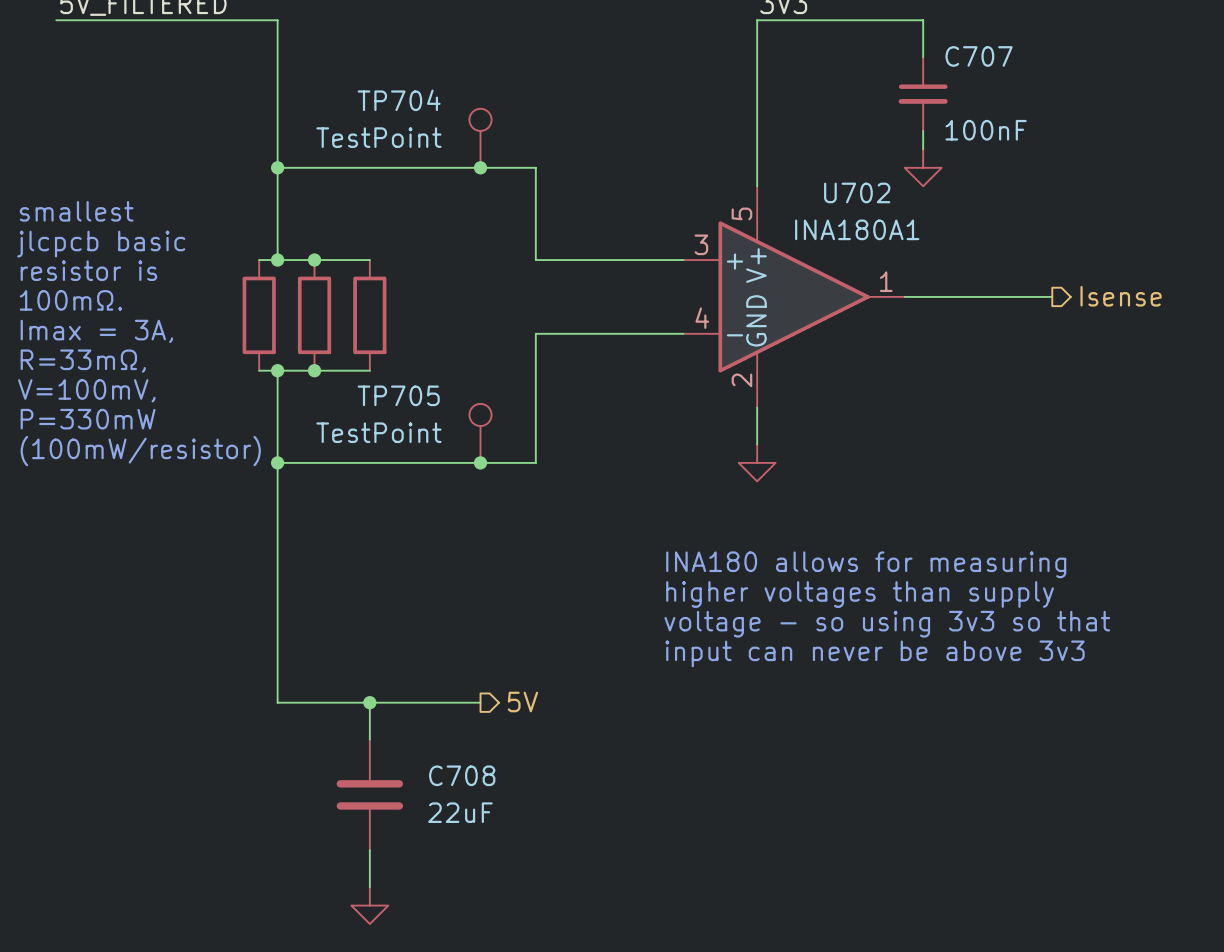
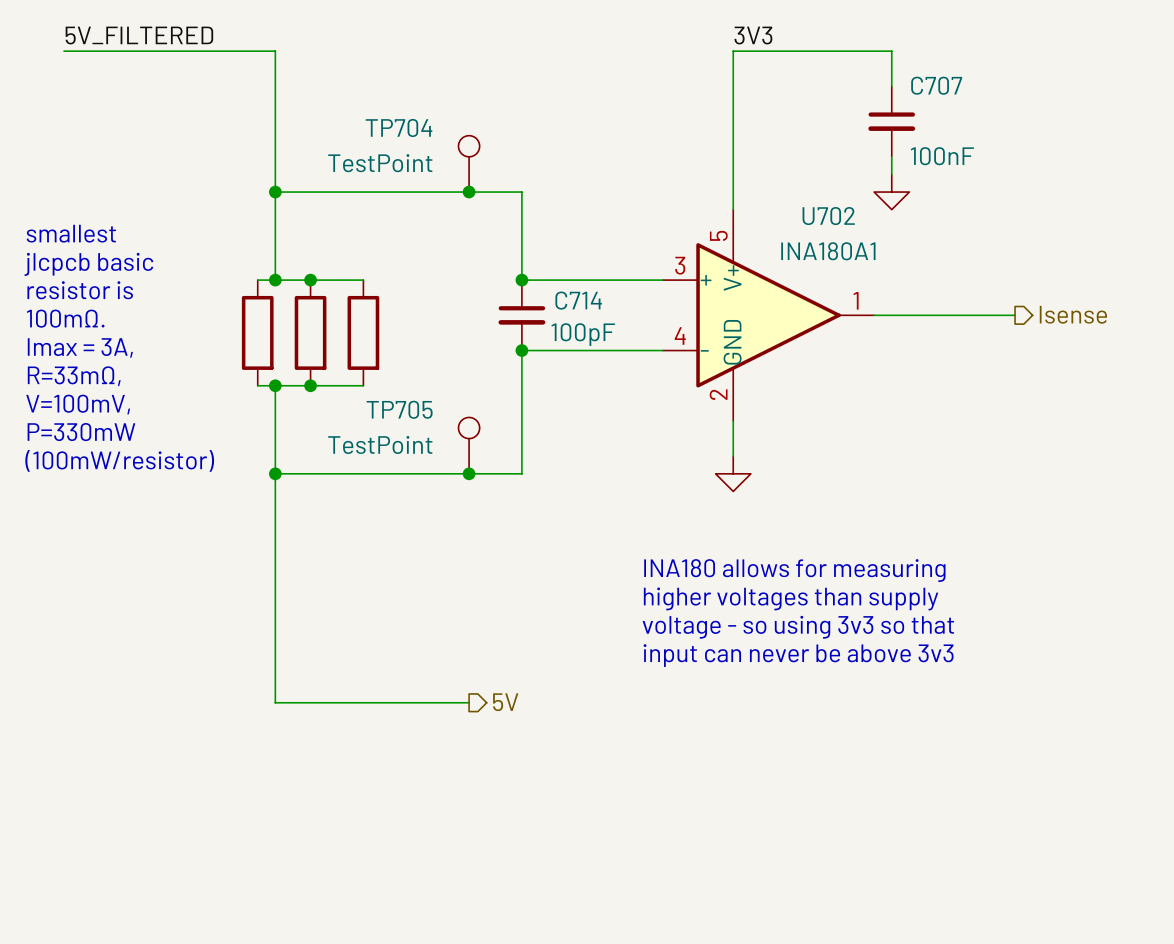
junction: none -> (521, 280)
C714: none -> 100pF (521, 315)
junction: none -> (521, 350)
wire: (369, 702) (369, 739) -> none
junction: (369, 702) -> none
C708: 22uF (369, 794) -> none
wire: (369, 850) (369, 887) -> none
power symbol: (369, 905) -> none

